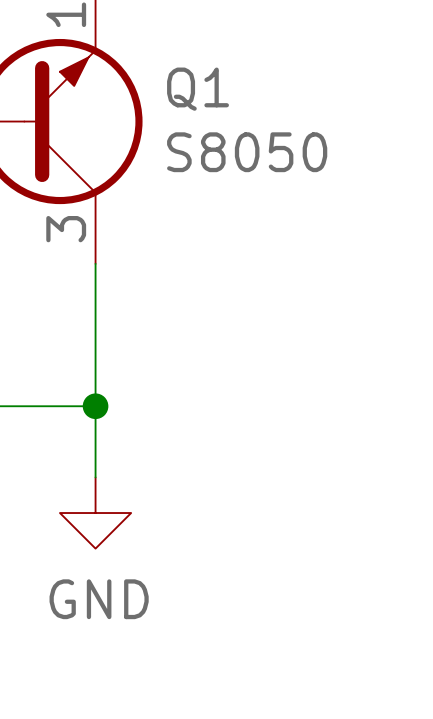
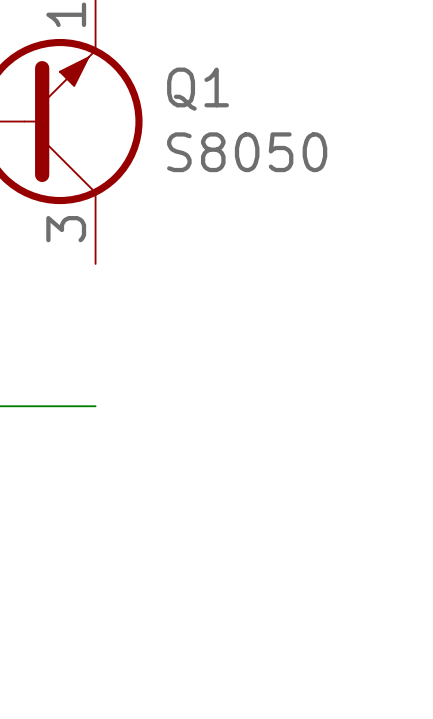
wire: (95, 263) (95, 477) -> none
junction: (95, 406) -> none
power symbol: GND (95, 513) -> none

